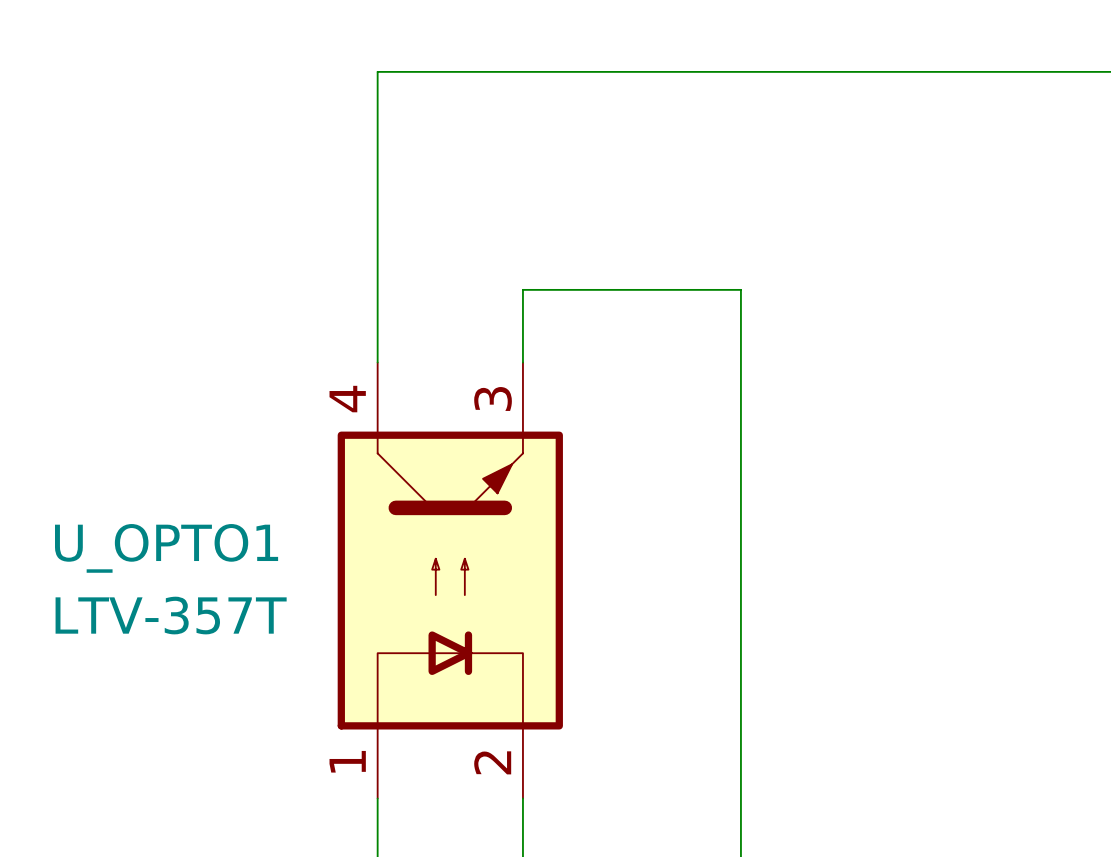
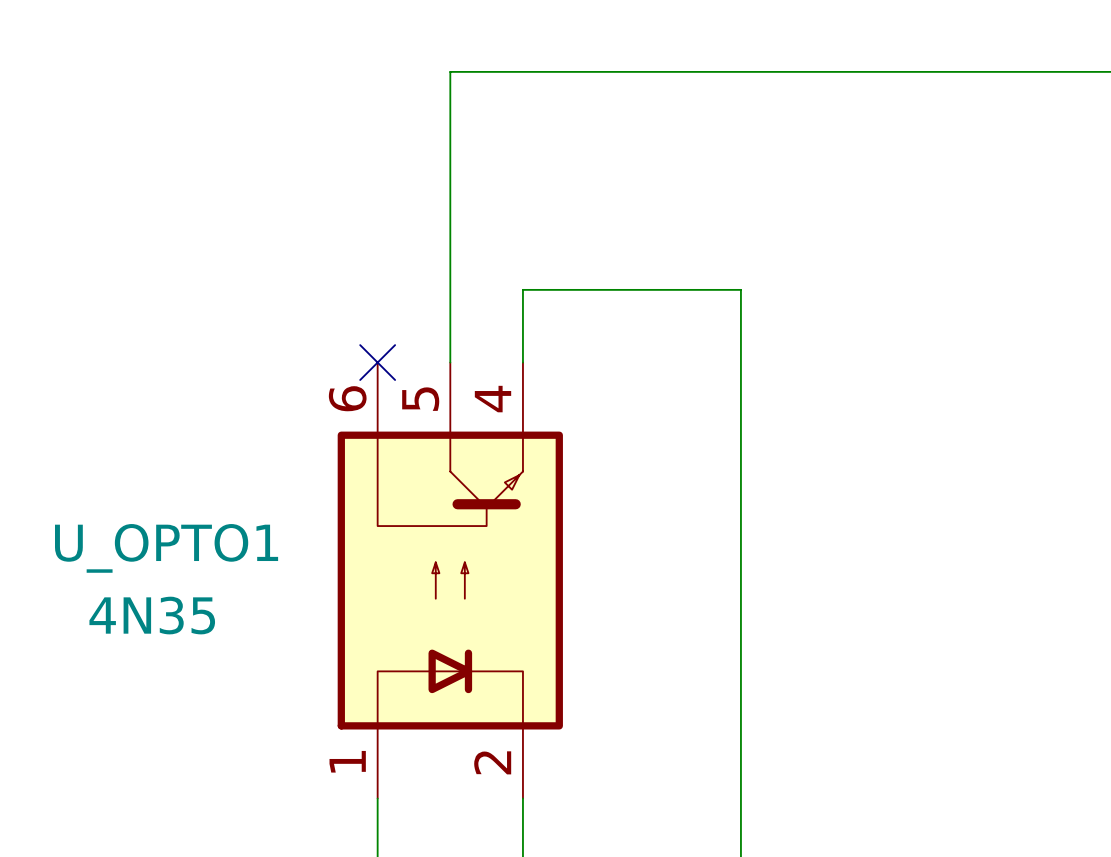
wire: (450, 71) (377, 71) (377, 362) -> (450, 71) (450, 362)
U_OPTO1 symbol: [337, 362, 563, 799] -> [337, 362, 563, 799]
no-connect mark: none -> (377, 362)
U_OPTO1 value: LTV-357T (171, 615) -> 4N35 (152, 615)

